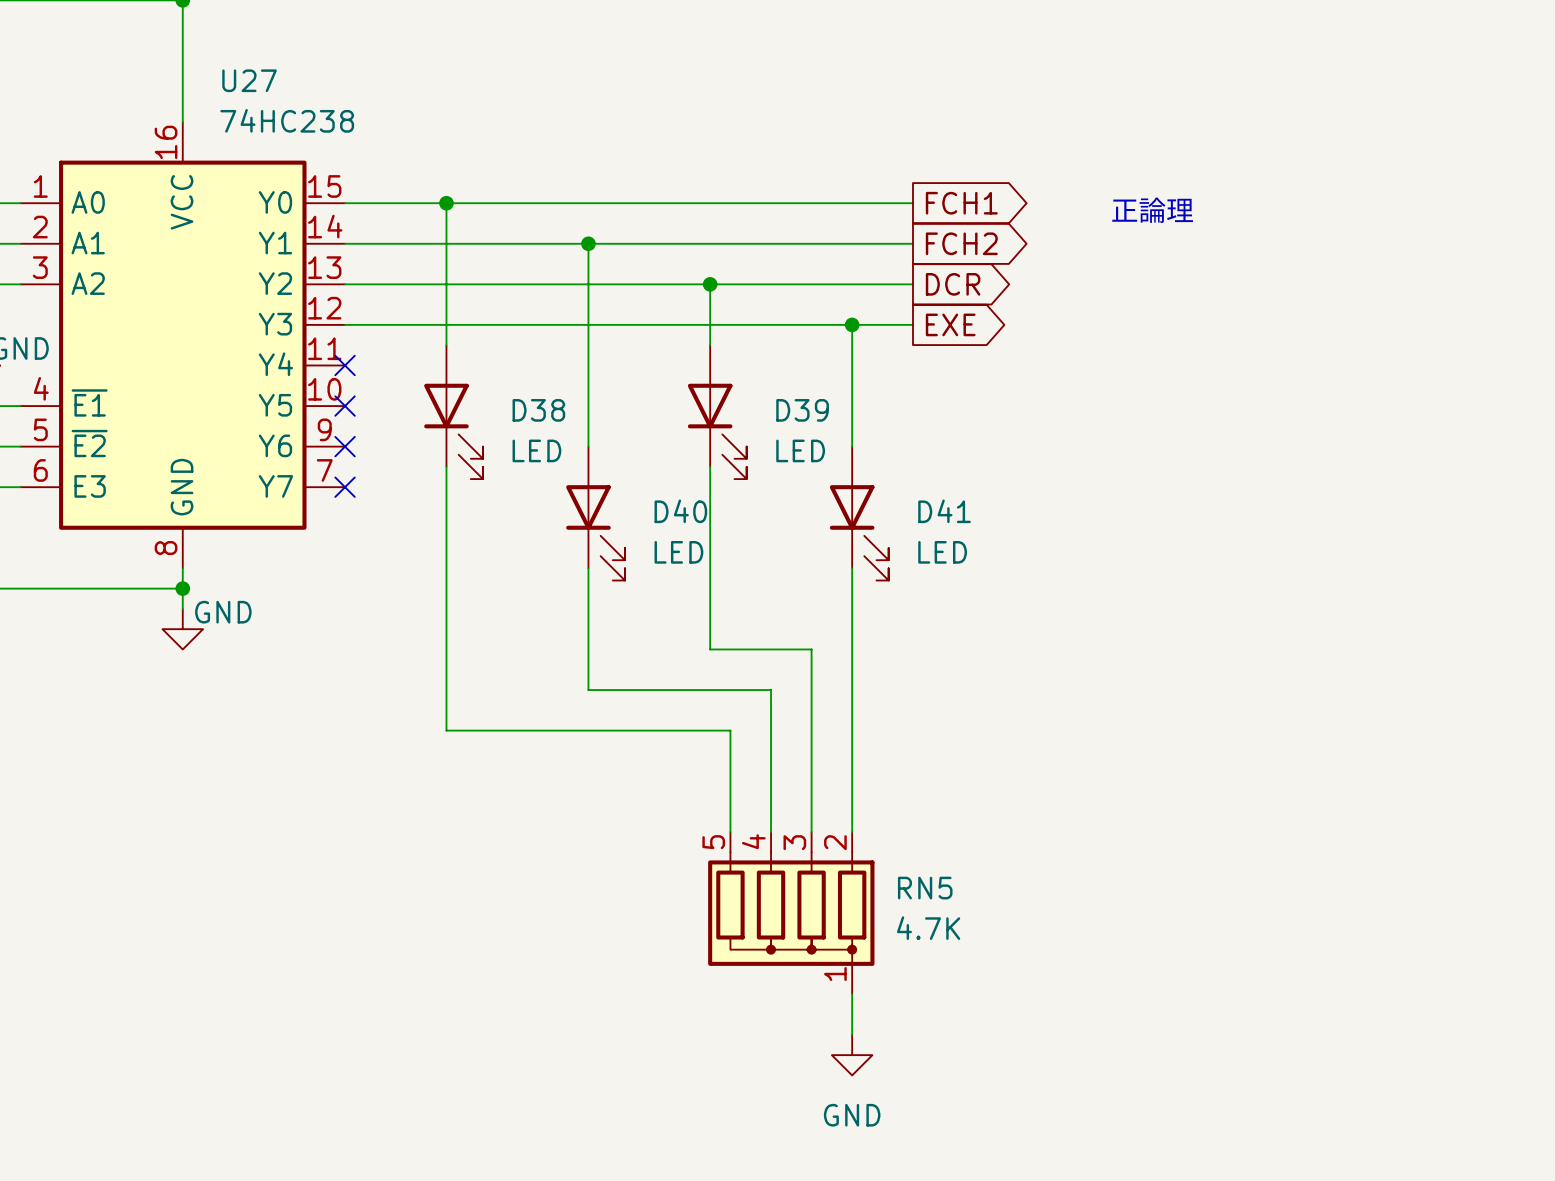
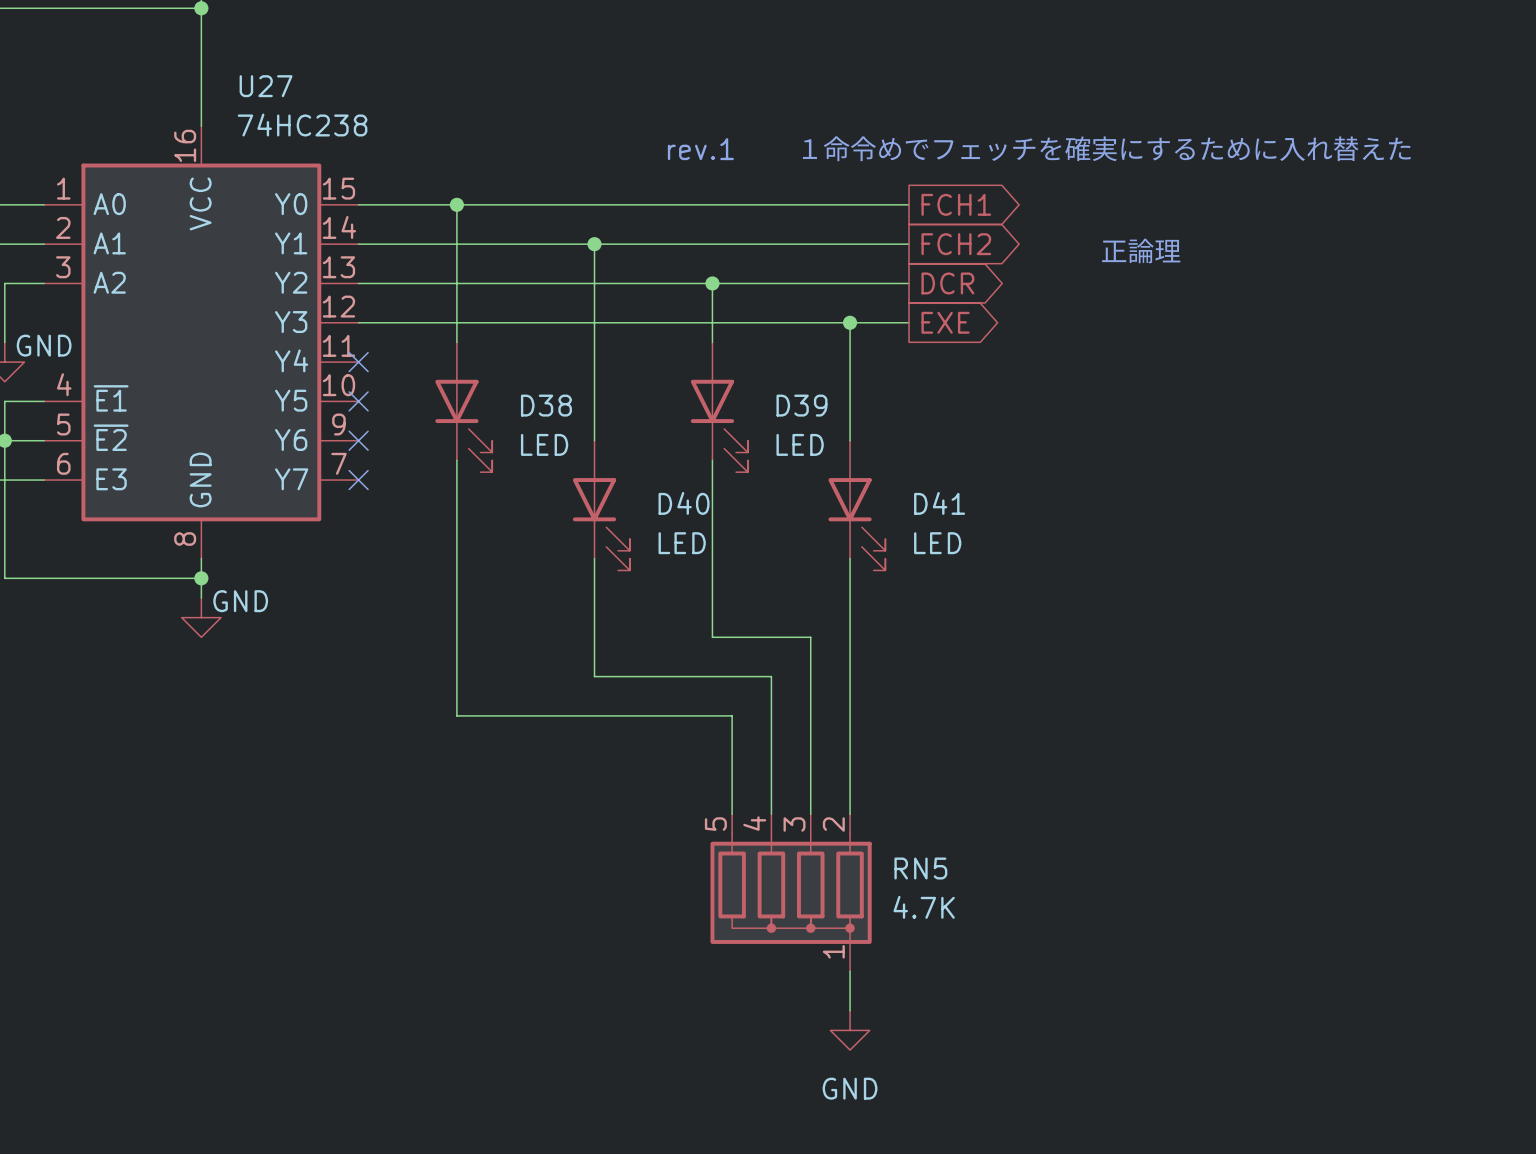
text: none -> rev.1 １命令めでフェッチを確実にするために入れ替えた (1039, 148)
text position: 正論理 (1152, 210) -> 正論理 (1141, 250)

